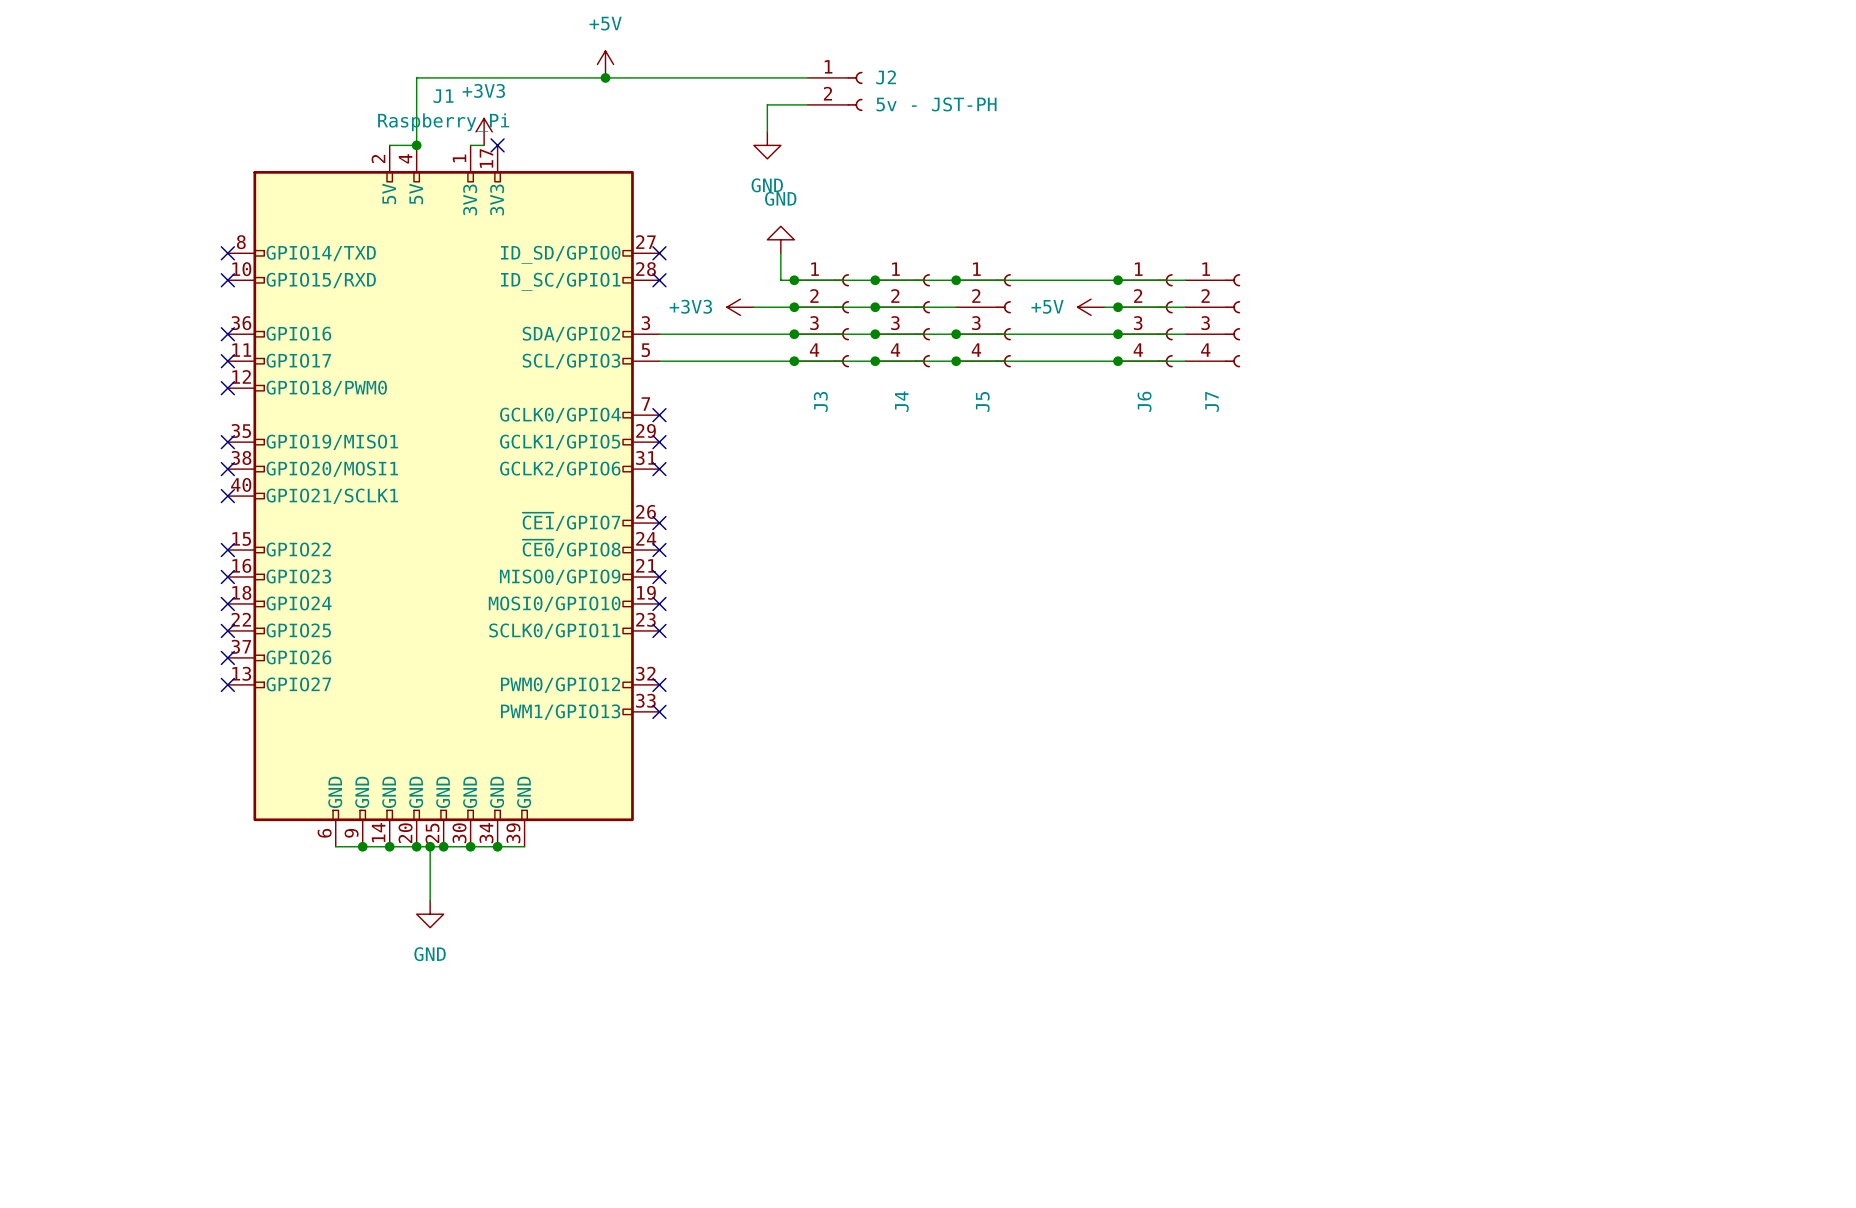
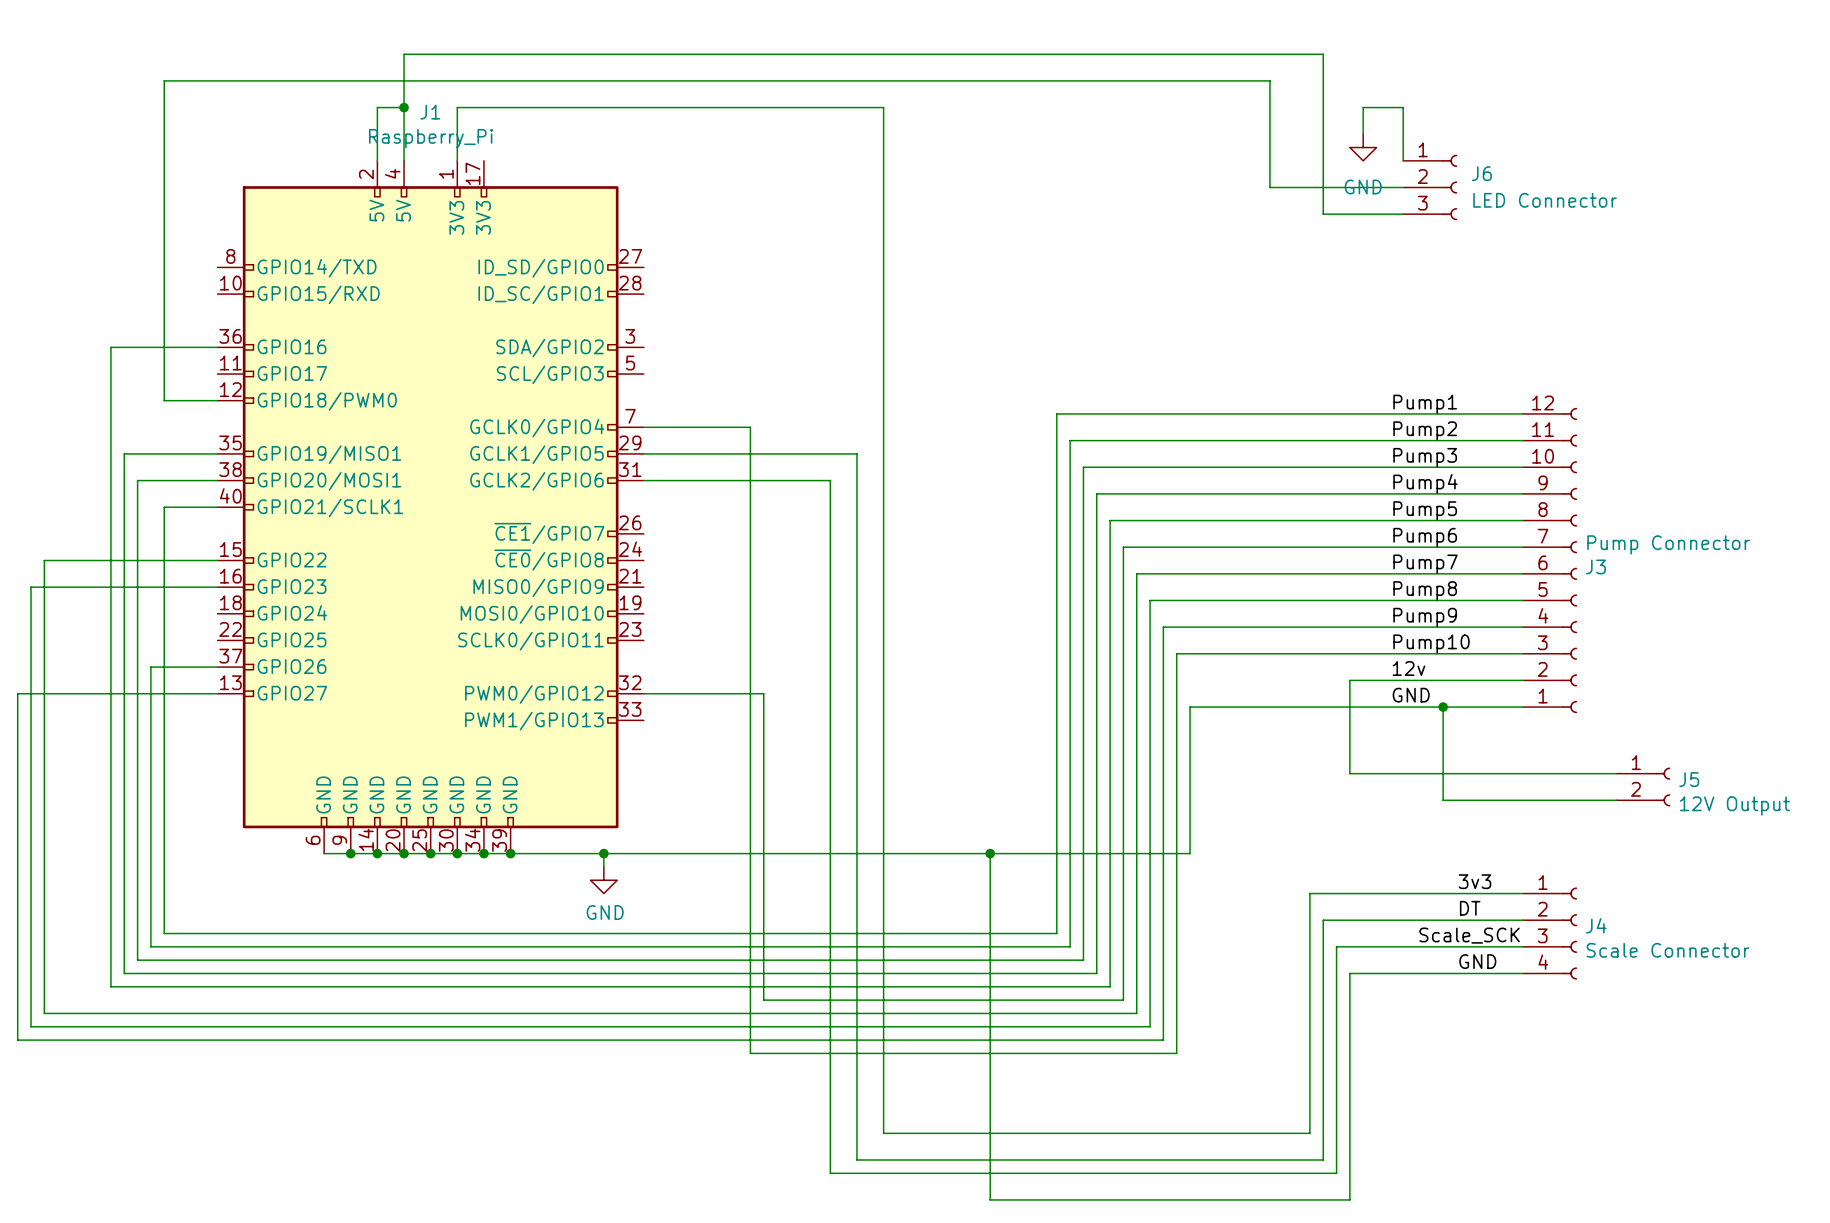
power symbol: +5V (605, 64) -> none
wire: (416, 77) (807, 77) -> (404, 94) (404, 54) (1323, 54) (1323, 214) (1403, 214)
junction: (605, 77) -> none
J2: 5v - JST-PH (835, 91) -> none
wire: (807, 104) (767, 104) (767, 131) -> none
wire: none -> (1363, 134) (1363, 107) (1403, 107) (1403, 160)
power symbol: +3V3 (484, 131) -> none
power symbol: none -> GND (1363, 147)
wire: (389, 145) (416, 145) -> (377, 160) (377, 107) (404, 107)
junction position: (416, 145) -> (404, 107)
wire: (470, 145) (484, 145) -> (457, 160) (457, 107) (883, 107) (883, 1133) (1309, 1133) (1309, 893) (1523, 893)
no-connect mark: (497, 145) -> none
power symbol: GND (767, 145) -> none
wire: none -> (1403, 187) (1269, 187) (1269, 80) (164, 80) (164, 400) (217, 400)
J6 value: none -> LED Connector (1545, 200)
power symbol: GND (780, 239) -> none
no-connect mark: (227, 253) -> none
no-connect mark: (659, 253) -> none
wire: (780, 253) (780, 280) (1185, 280) -> none
J3 symbol: [794, 274, 850, 368] -> [1523, 407, 1578, 714]
J5 symbol: [956, 274, 1011, 368] -> [1616, 767, 1671, 807]
J6 symbol: [1118, 274, 1173, 368] -> [1403, 154, 1458, 221]
no-connect mark: (227, 280) -> none
no-connect mark: (659, 280) -> none
junction: (794, 280) -> none
junction: (875, 280) -> none
junction: (956, 280) -> none
junction: (1118, 280) -> none
power symbol: +3V3 (740, 307) -> none
wire: (753, 307) (956, 307) -> none
junction: (794, 307) -> none
junction: (875, 307) -> none
power symbol: +5V (1091, 307) -> none
wire: (1104, 307) (1185, 307) -> none
junction: (1118, 307) -> none
J4 position: (902, 320) -> (1550, 933)
J7: (1212, 320) -> none
wire: none -> (217, 347) (110, 347) (110, 986) (1110, 986) (1110, 520) (1523, 520)
no-connect mark: (227, 334) -> none
wire: (659, 334) (1185, 334) -> none
junction: (794, 334) -> none
junction: (875, 334) -> none
junction: (956, 334) -> none
junction: (1118, 334) -> none
no-connect mark: (227, 361) -> none
wire: (659, 361) (1185, 361) -> none
junction: (794, 361) -> none
junction: (875, 361) -> none
junction: (956, 361) -> none
junction: (1118, 361) -> none
no-connect mark: (227, 388) -> none
label: none -> Pump1 (1425, 404)
J3 name position: J3 (820, 401) -> J3 (1595, 566)
J4 name rotation: 0° (901, 401) -> 90° clockwise (1596, 925)
J4 name position: J4 (901, 401) -> J4 (1596, 925)
J5 name position: J5 (982, 401) -> J5 (1689, 779)
J6 name position: J6 (1144, 401) -> J6 (1481, 173)
wire: none -> (1523, 413) (1056, 413) (1056, 933) (164, 933) (164, 507) (217, 507)
wire: none -> (643, 427) (750, 427) (750, 1053) (1176, 1053) (1176, 653) (1523, 653)
no-connect mark: (659, 415) -> none
label: none -> Pump2 (1425, 430)
wire: none -> (1523, 440) (1070, 440) (1070, 946) (150, 946) (150, 667) (217, 667)
wire: none -> (217, 453) (124, 453) (124, 973) (1096, 973) (1096, 493) (1523, 493)
no-connect mark: (227, 442) -> none
wire: none -> (643, 453) (856, 453) (856, 1159) (1323, 1159) (1323, 920) (1523, 920)
no-connect mark: (659, 442) -> none
label: none -> Pump3 (1425, 457)
wire: none -> (1523, 467) (1083, 467) (1083, 960) (137, 960) (137, 480) (217, 480)
no-connect mark: (227, 469) -> none
wire: none -> (643, 480) (830, 480) (830, 1173) (1336, 1173) (1336, 946) (1523, 946)
no-connect mark: (659, 469) -> none
label: none -> Pump4 (1425, 483)
no-connect mark: (227, 496) -> none
label: none -> Pump5 (1425, 510)
no-connect mark: (659, 523) -> none
label: none -> Pump6 (1425, 537)
J3 value: none -> Pump Connector (1668, 544)
wire: none -> (1523, 547) (1123, 547) (1123, 1000) (763, 1000) (763, 693) (643, 693)
wire: none -> (217, 560) (44, 560) (44, 1013) (1136, 1013) (1136, 573) (1523, 573)
no-connect mark: (227, 550) -> none
no-connect mark: (659, 550) -> none
label: none -> Pump7 (1425, 564)
wire: none -> (217, 587) (31, 587) (31, 1026) (1150, 1026) (1150, 600) (1523, 600)
no-connect mark: (227, 577) -> none
no-connect mark: (659, 577) -> none
label: none -> Pump8 (1425, 590)
no-connect mark: (227, 603) -> none
no-connect mark: (659, 603) -> none
label: none -> Pump9 (1425, 617)
wire: none -> (1523, 627) (1163, 627) (1163, 1040) (17, 1040) (17, 693) (217, 693)
no-connect mark: (227, 630) -> none
no-connect mark: (659, 630) -> none
label: none -> Pump10 (1431, 644)
no-connect mark: (227, 657) -> none
label: none -> 12v (1408, 668)
wire: none -> (1523, 680) (1349, 680) (1349, 773) (1616, 773)
no-connect mark: (227, 684) -> none
no-connect mark: (659, 684) -> none
label: none -> GND (1411, 695)
wire: none -> (1443, 707) (1443, 800) (1616, 800)
junction: none -> (1443, 707)
wire: none -> (1523, 707) (1190, 707) (1190, 853) (510, 853)
no-connect mark: (659, 711) -> none
J5 value: none -> 12V Output (1734, 806)
wire: (430, 846) (430, 900) -> none
junction: (430, 846) -> none
junction: none -> (510, 853)
wire: none -> (603, 853) (603, 866)
junction: none -> (603, 853)
wire: none -> (990, 853) (990, 1199) (1349, 1199) (1349, 973) (1523, 973)
junction: none -> (990, 853)
label: none -> 3v3 (1474, 881)
label: none -> DT (1470, 908)
power symbol position: GND (430, 914) -> GND (603, 880)
label: none -> Scale_SCK (1469, 935)
J4 value: none -> Scale Connector (1667, 950)
power symbol text position: GND (430, 954) -> GND (605, 912)
label: none -> GND (1477, 961)

